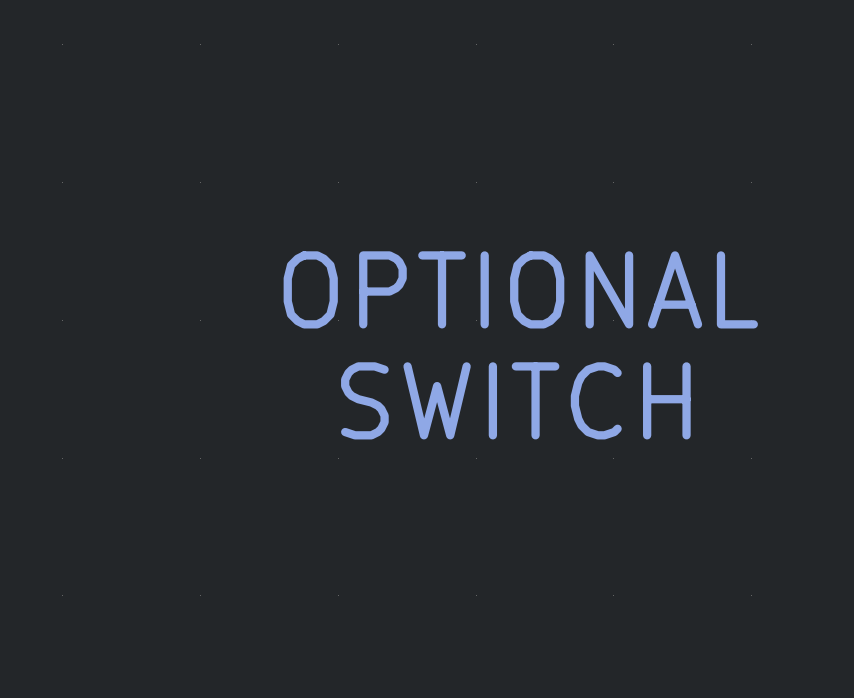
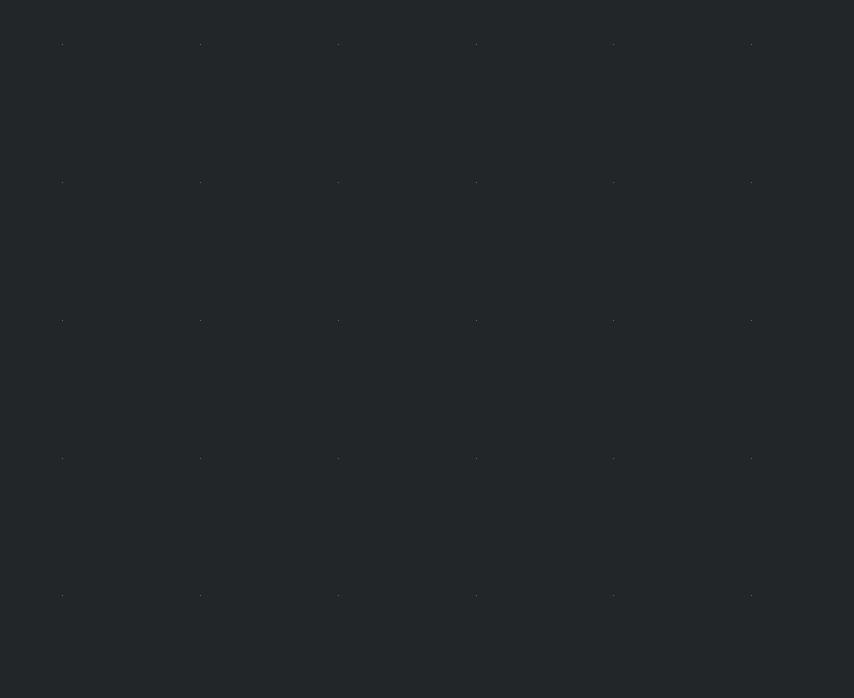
text: OPTIONAL (520, 289) -> none
text: SWITCH (515, 400) -> none

